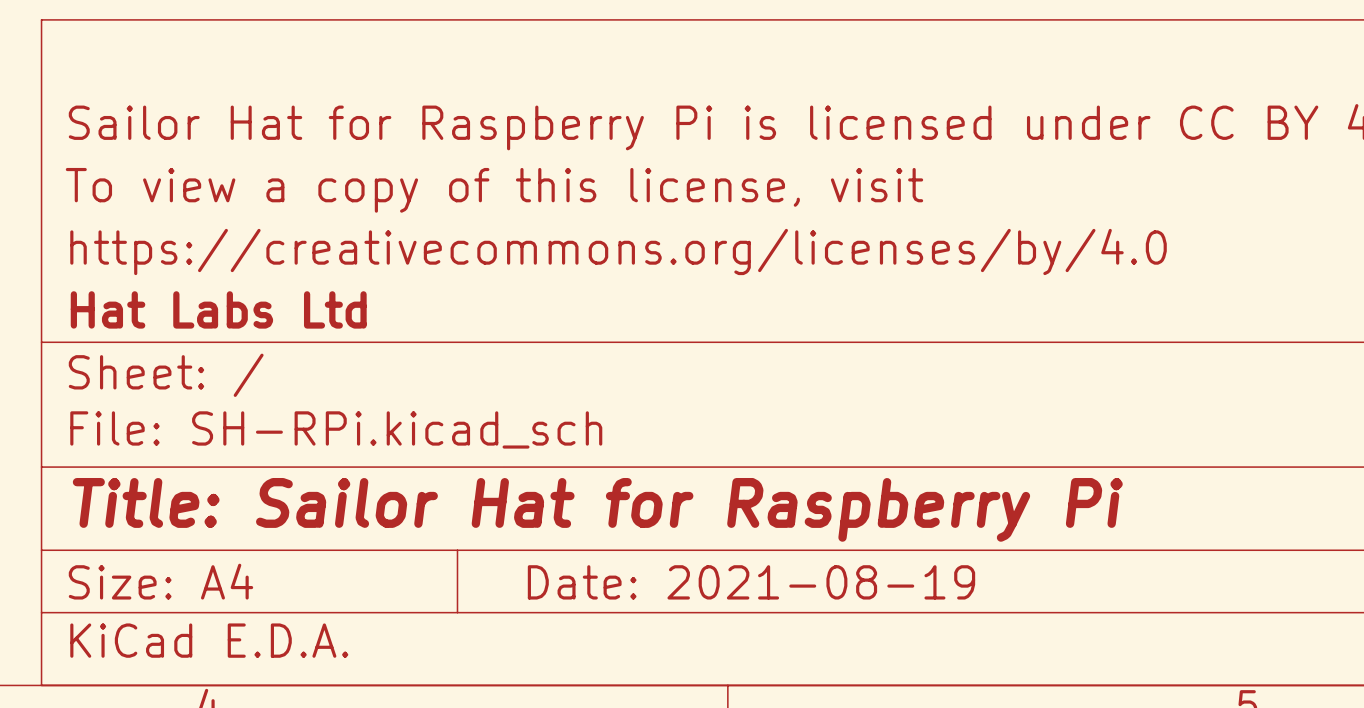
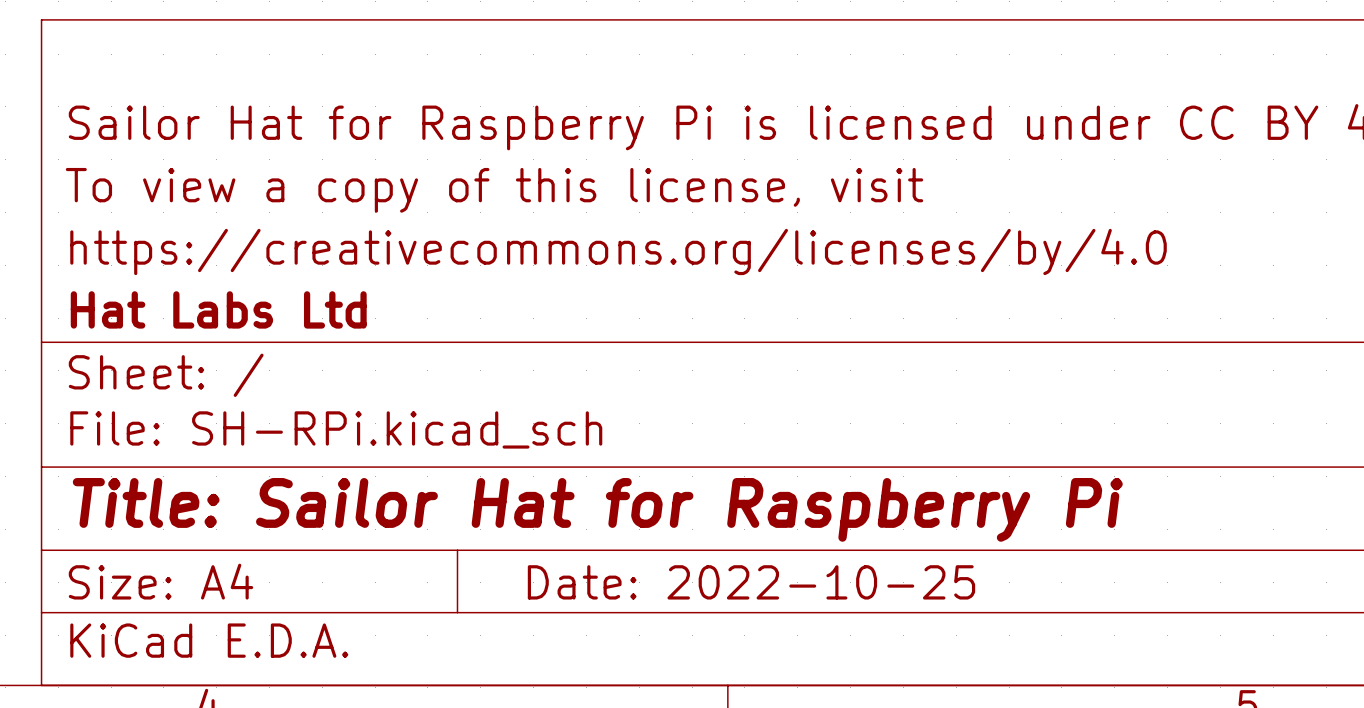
title block: Date: 2021-08-19 (751, 582) -> Date: 2022-10-25 (751, 582)

